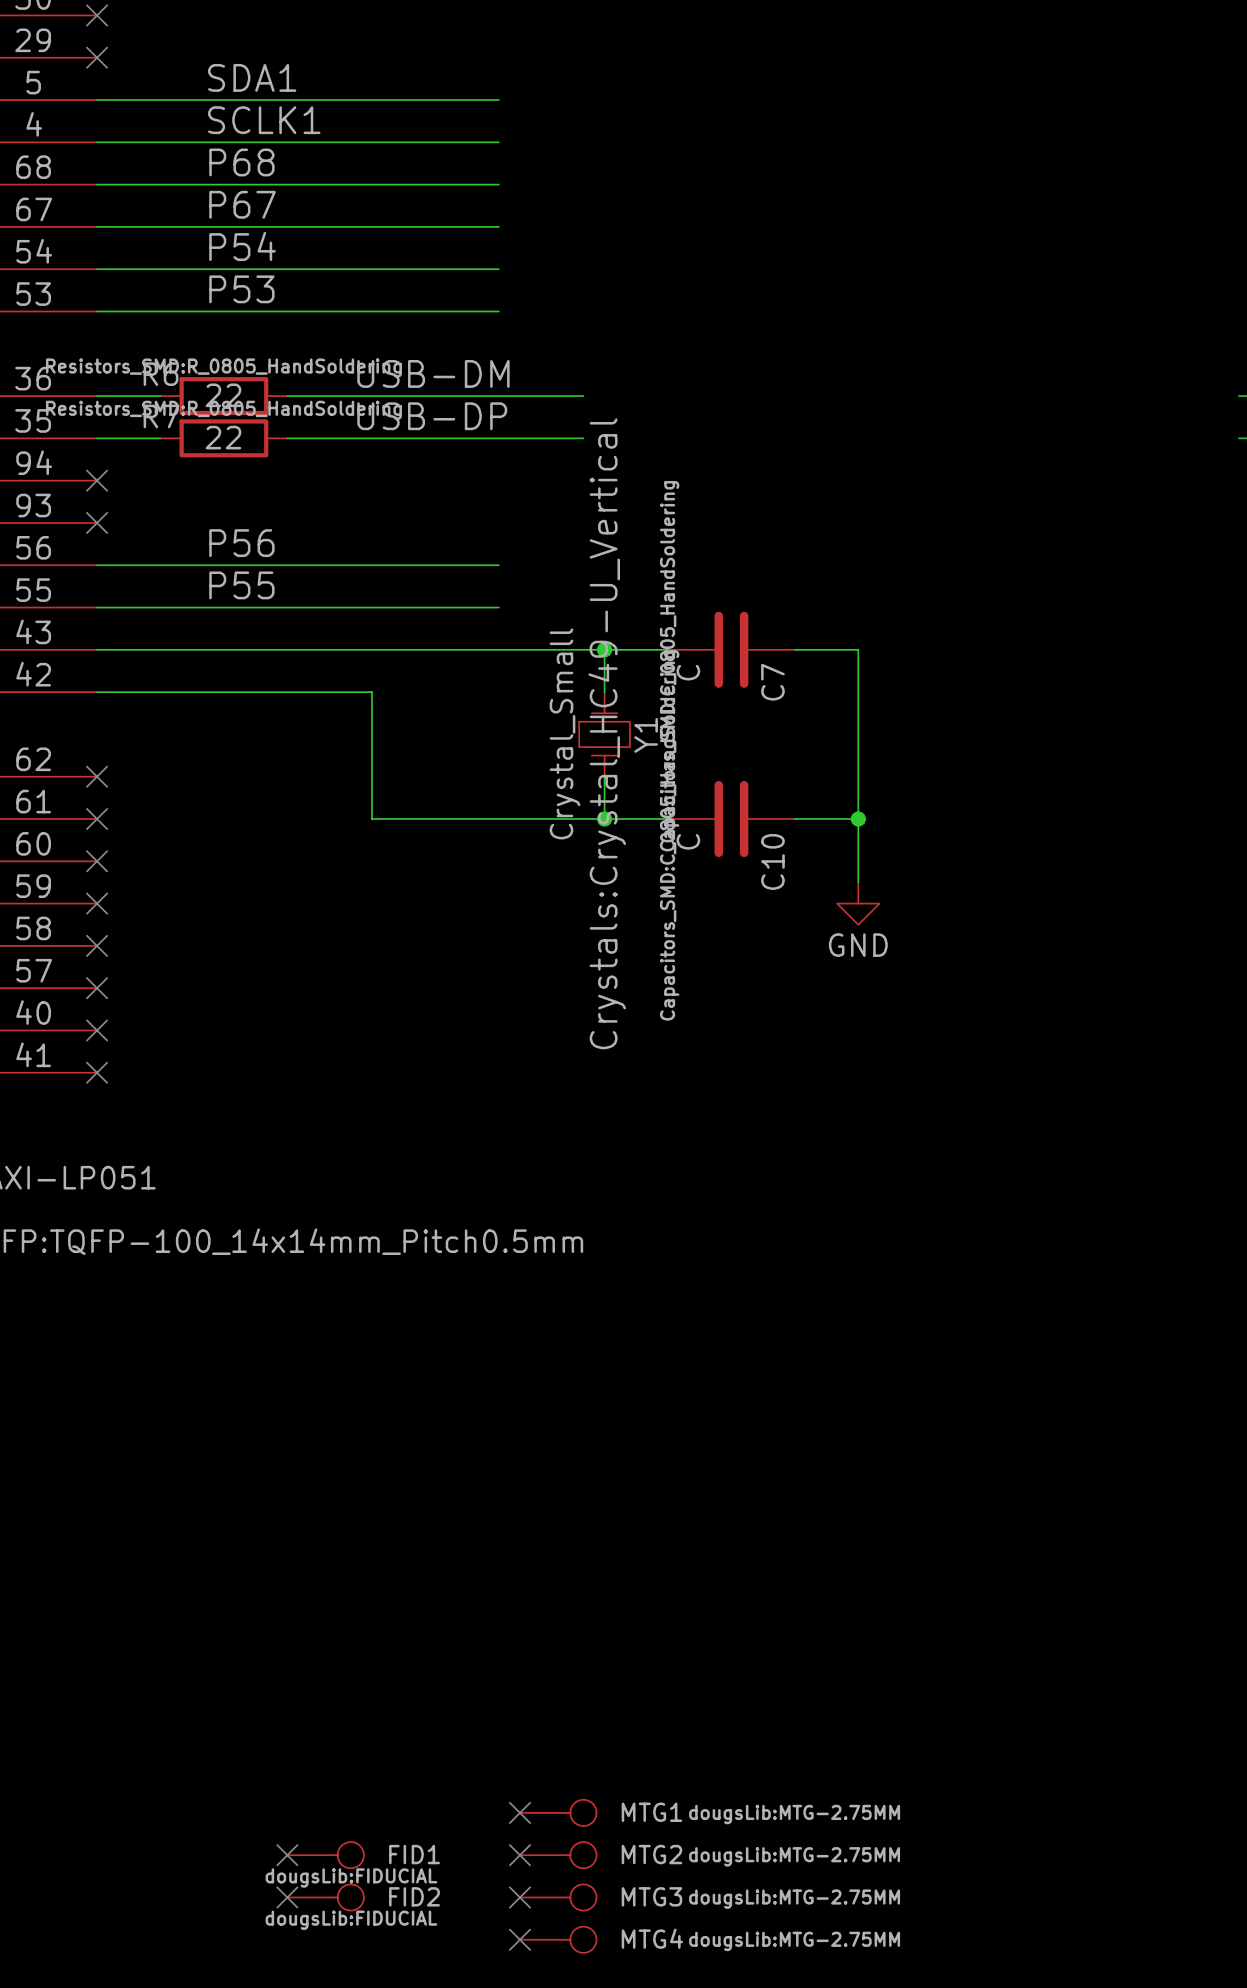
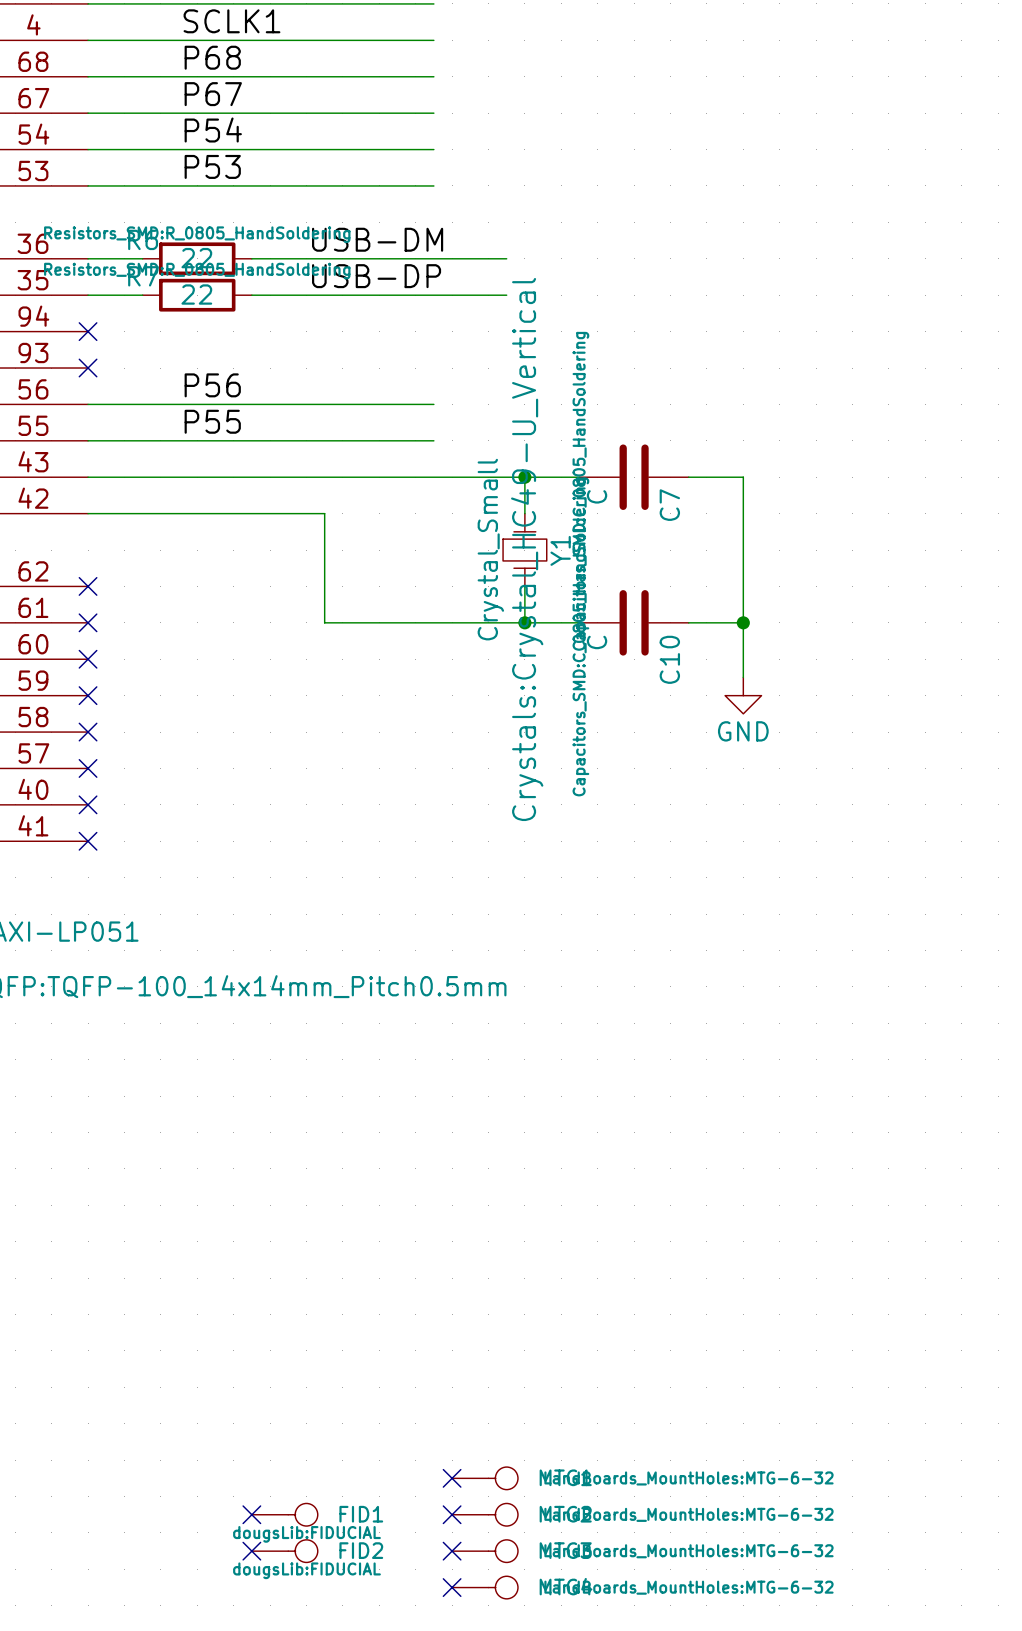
MTG1 text: dougsLib:MTG-2.75MM (794, 1814) -> LandBoards_MountHoles:MTG-6-32 (688, 1478)
MTG2 text: dougsLib:MTG-2.75MM (794, 1856) -> LandBoards_MountHoles:MTG-6-32 (688, 1514)
MTG3 text: dougsLib:MTG-2.75MM (794, 1899) -> LandBoards_MountHoles:MTG-6-32 (688, 1551)
MTG4 text: dougsLib:MTG-2.75MM (794, 1941) -> LandBoards_MountHoles:MTG-6-32 (688, 1587)

